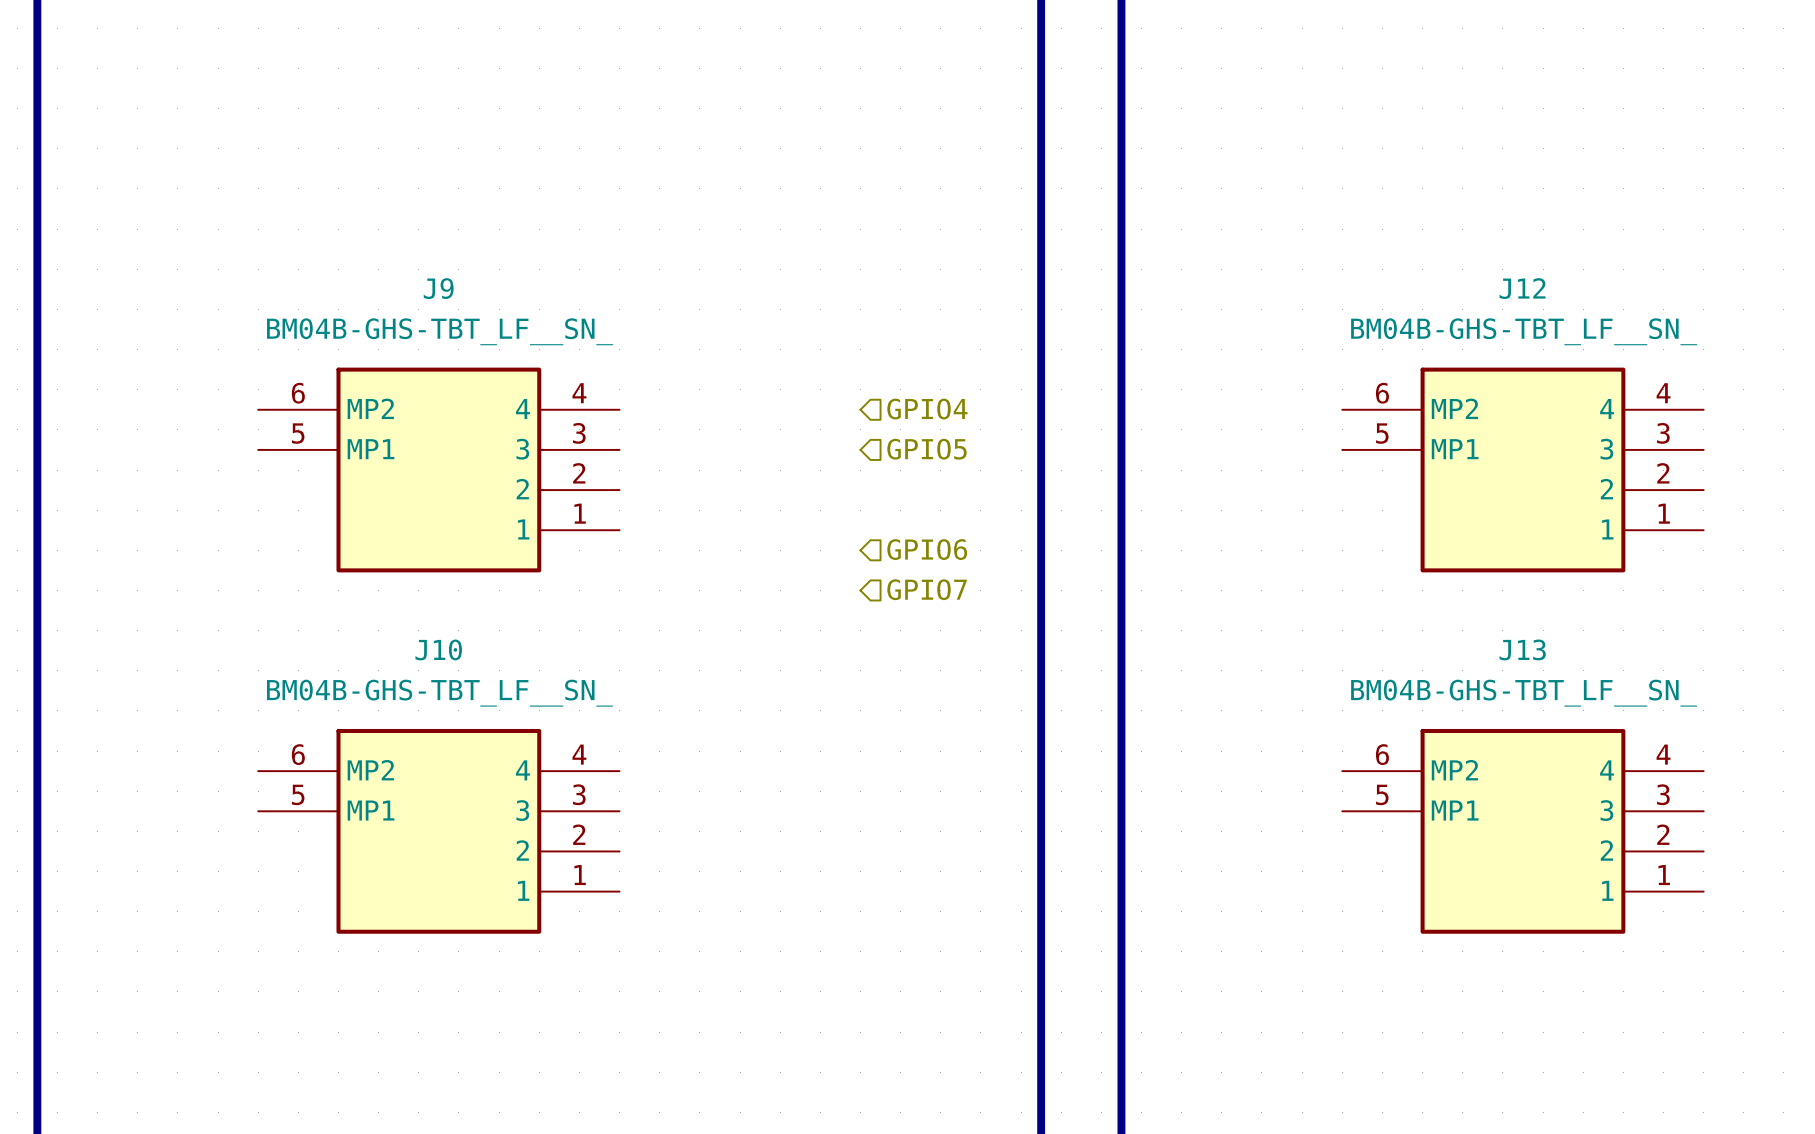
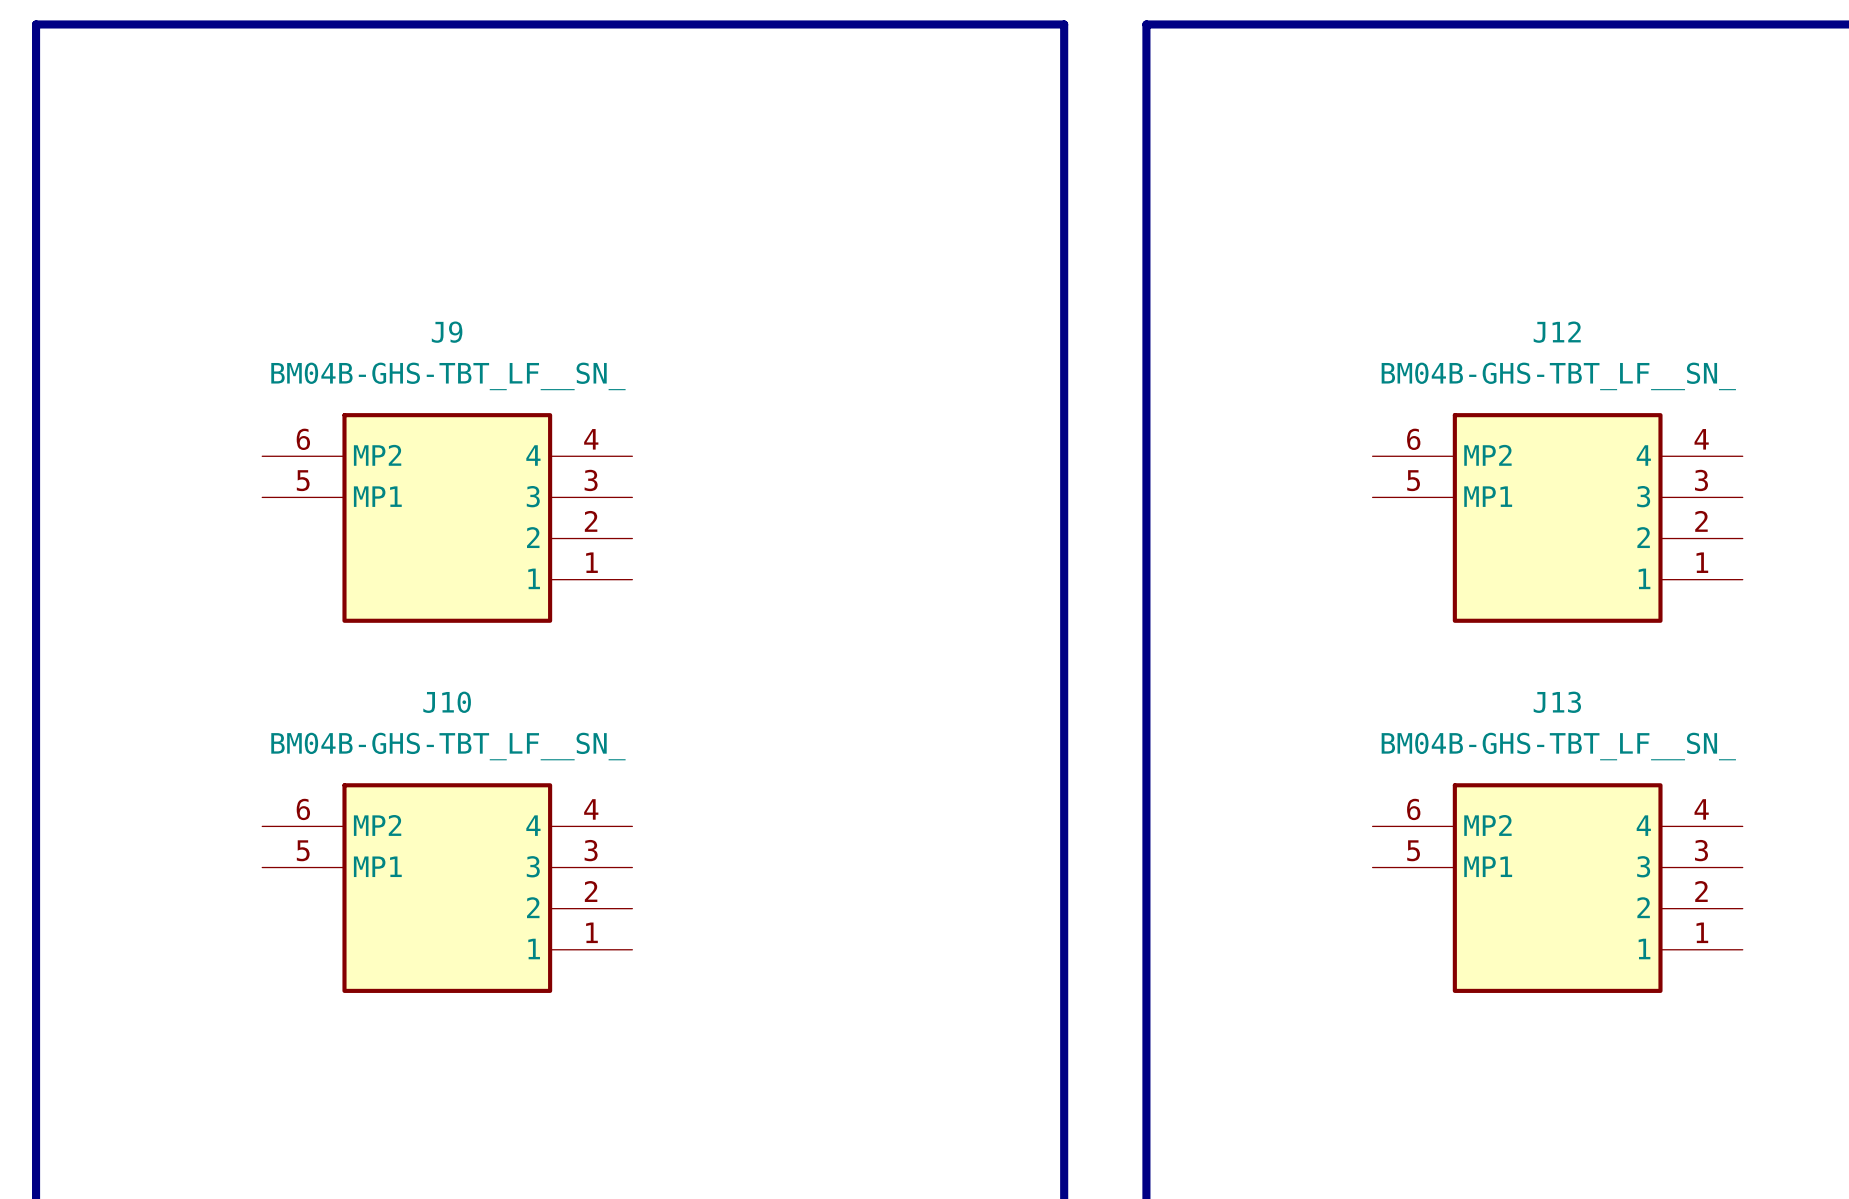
hierarchical label: GPIO4 (927, 409) -> none
hierarchical label: GPIO5 (926, 449) -> none
hierarchical label: GPIO6 (927, 549) -> none
hierarchical label: GPIO7 (927, 589) -> none

